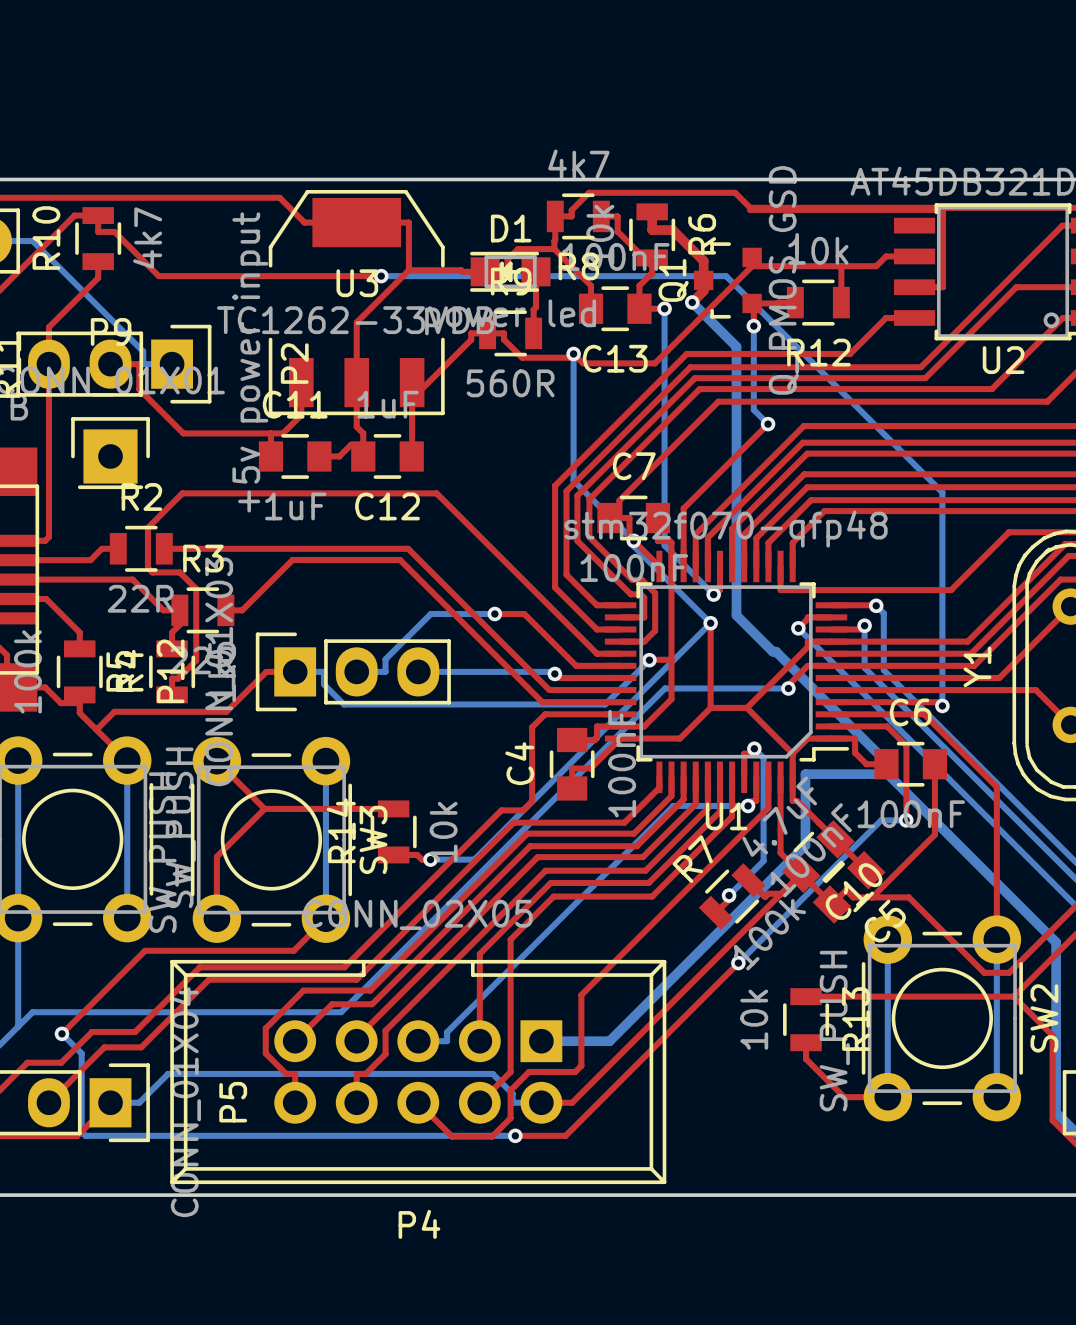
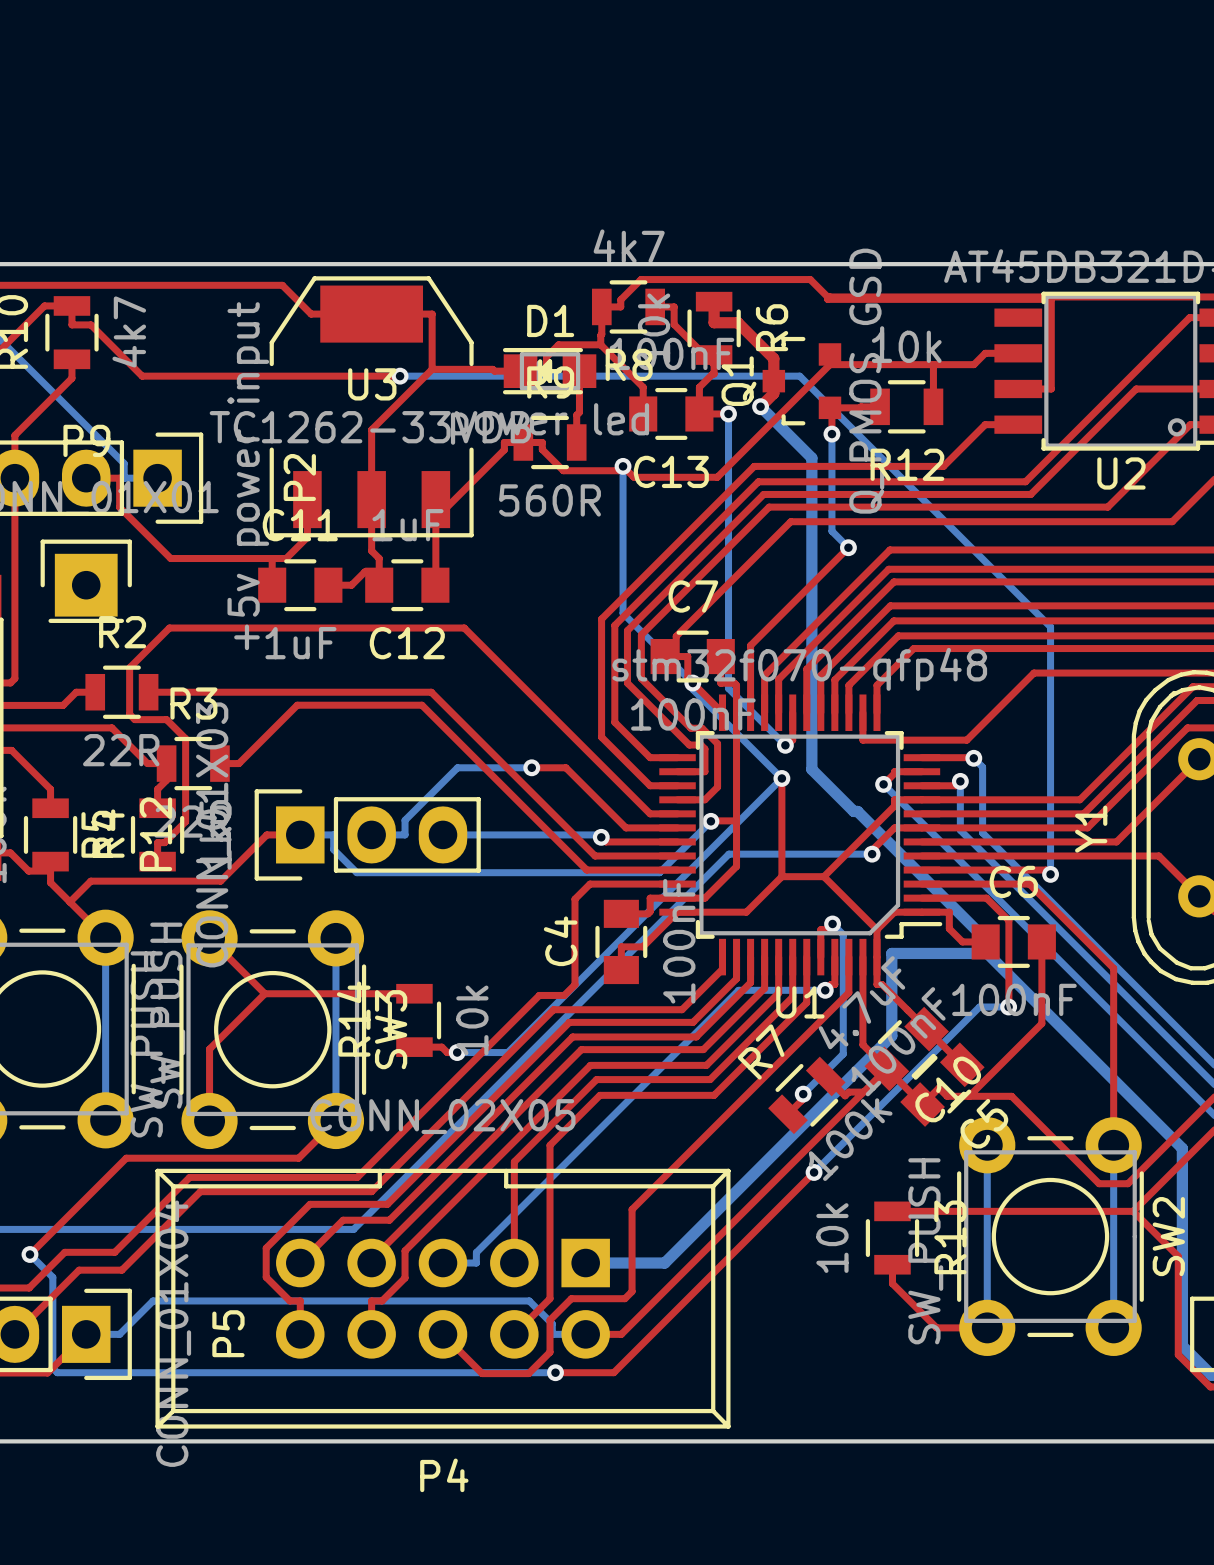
top track: (1008, 532) (951, 590) (870, 590) -> (1127, 673) (1033, 673) (966, 740)

